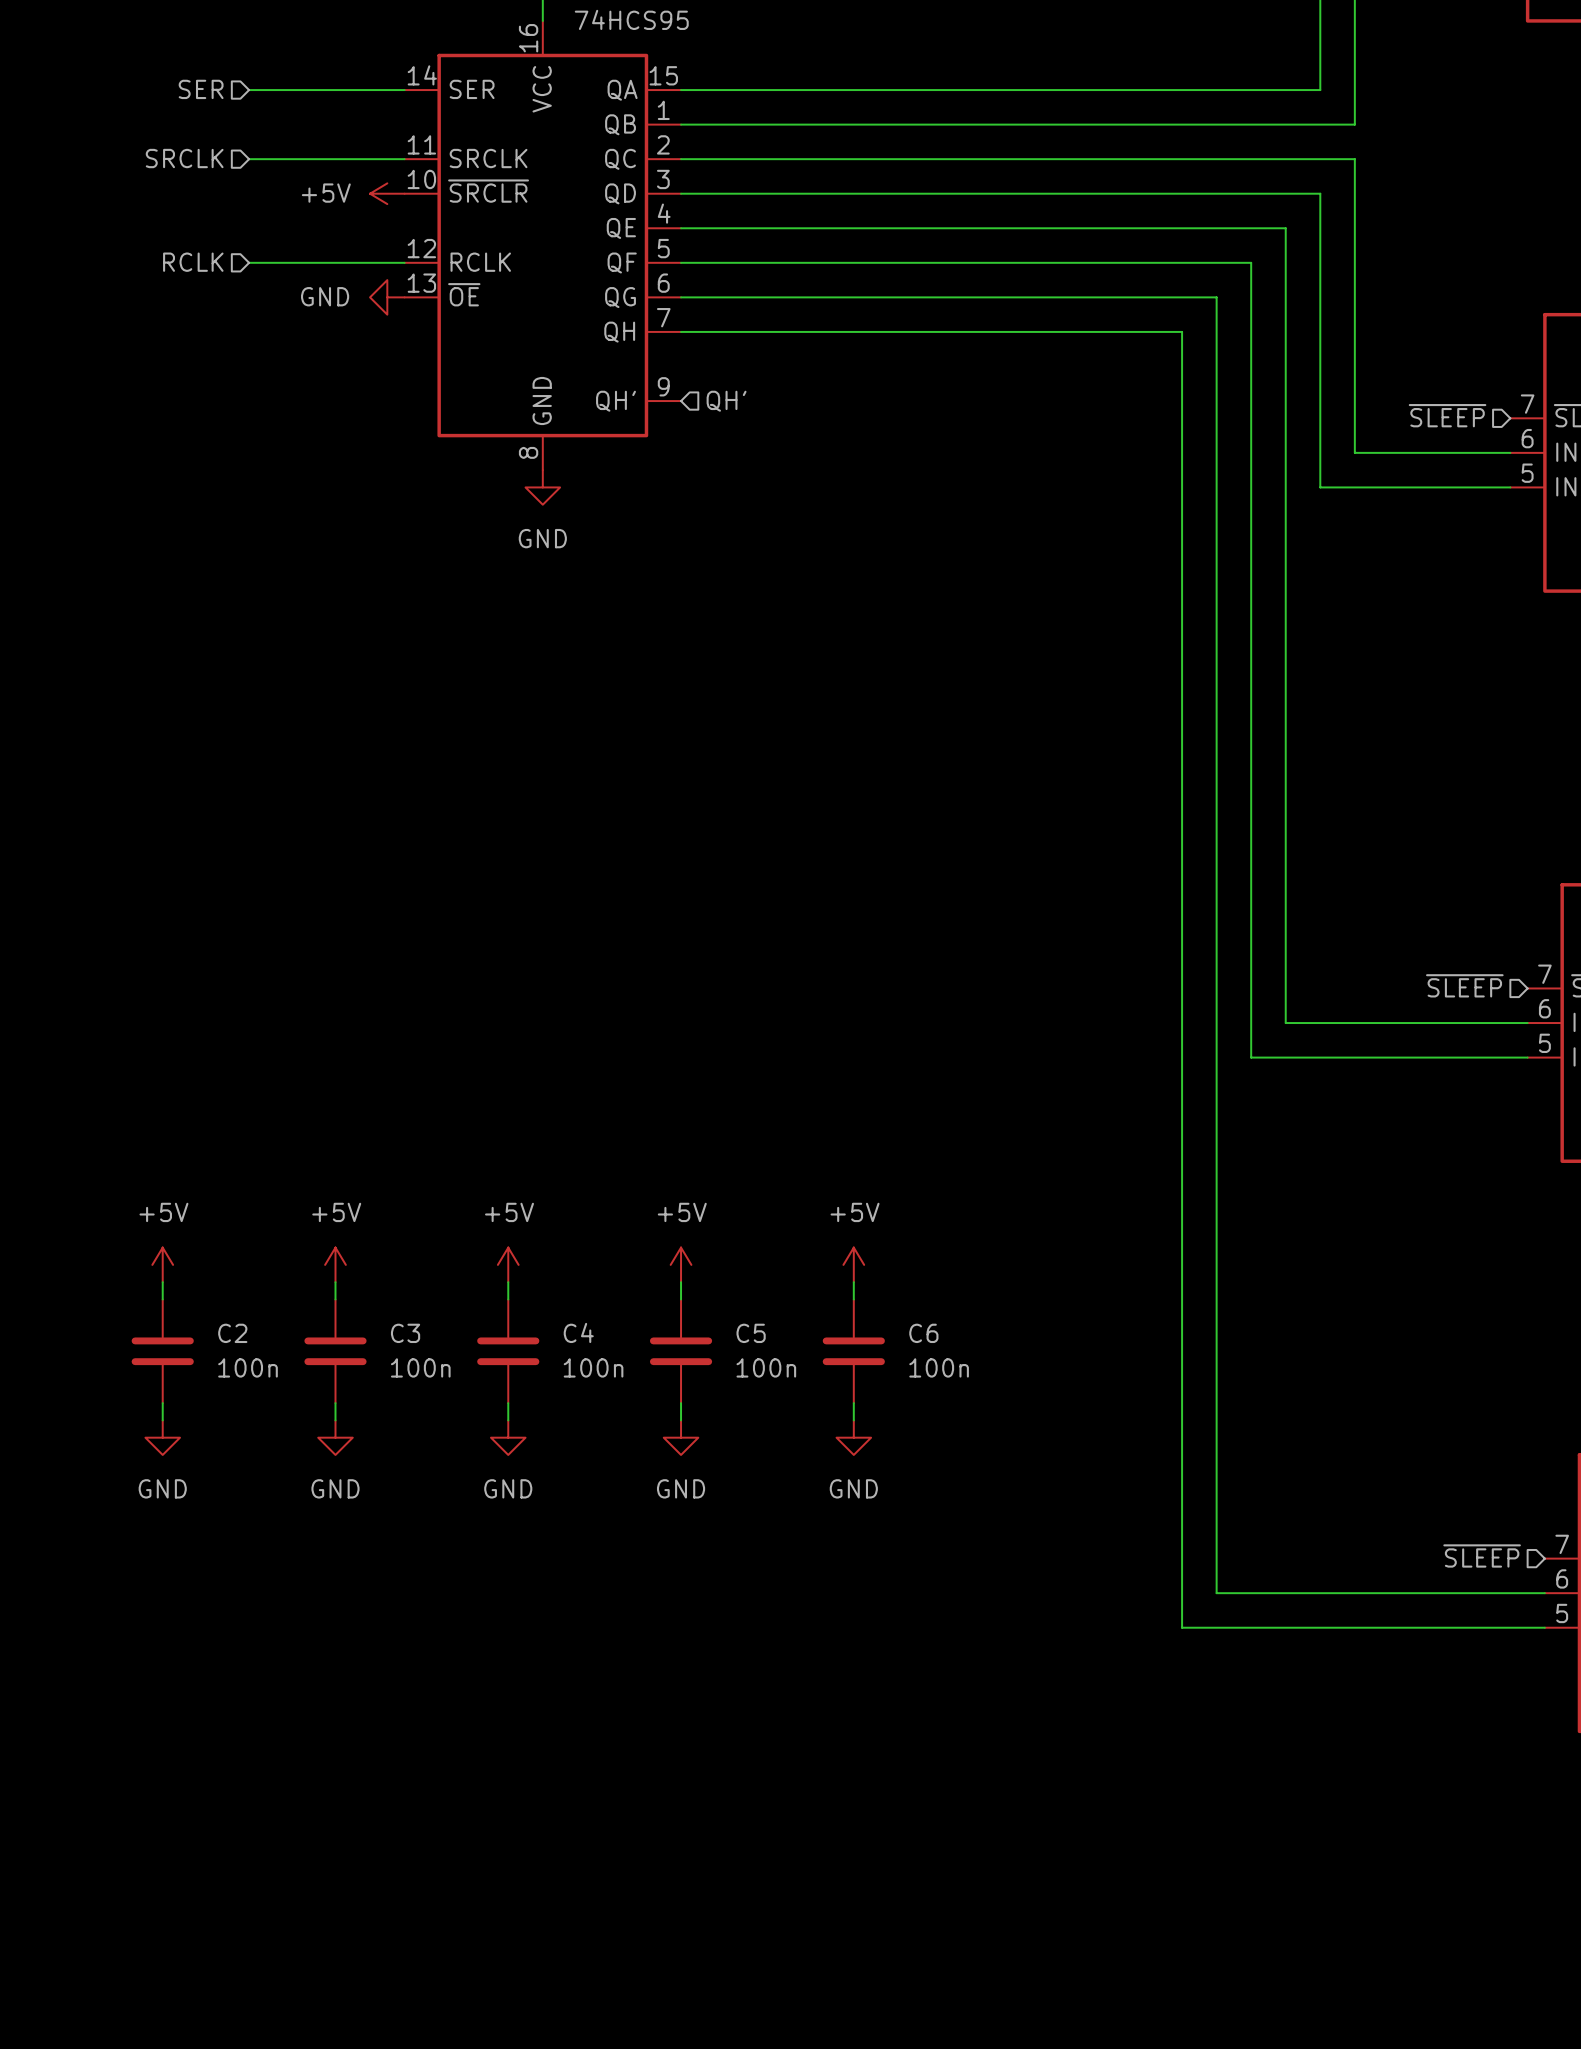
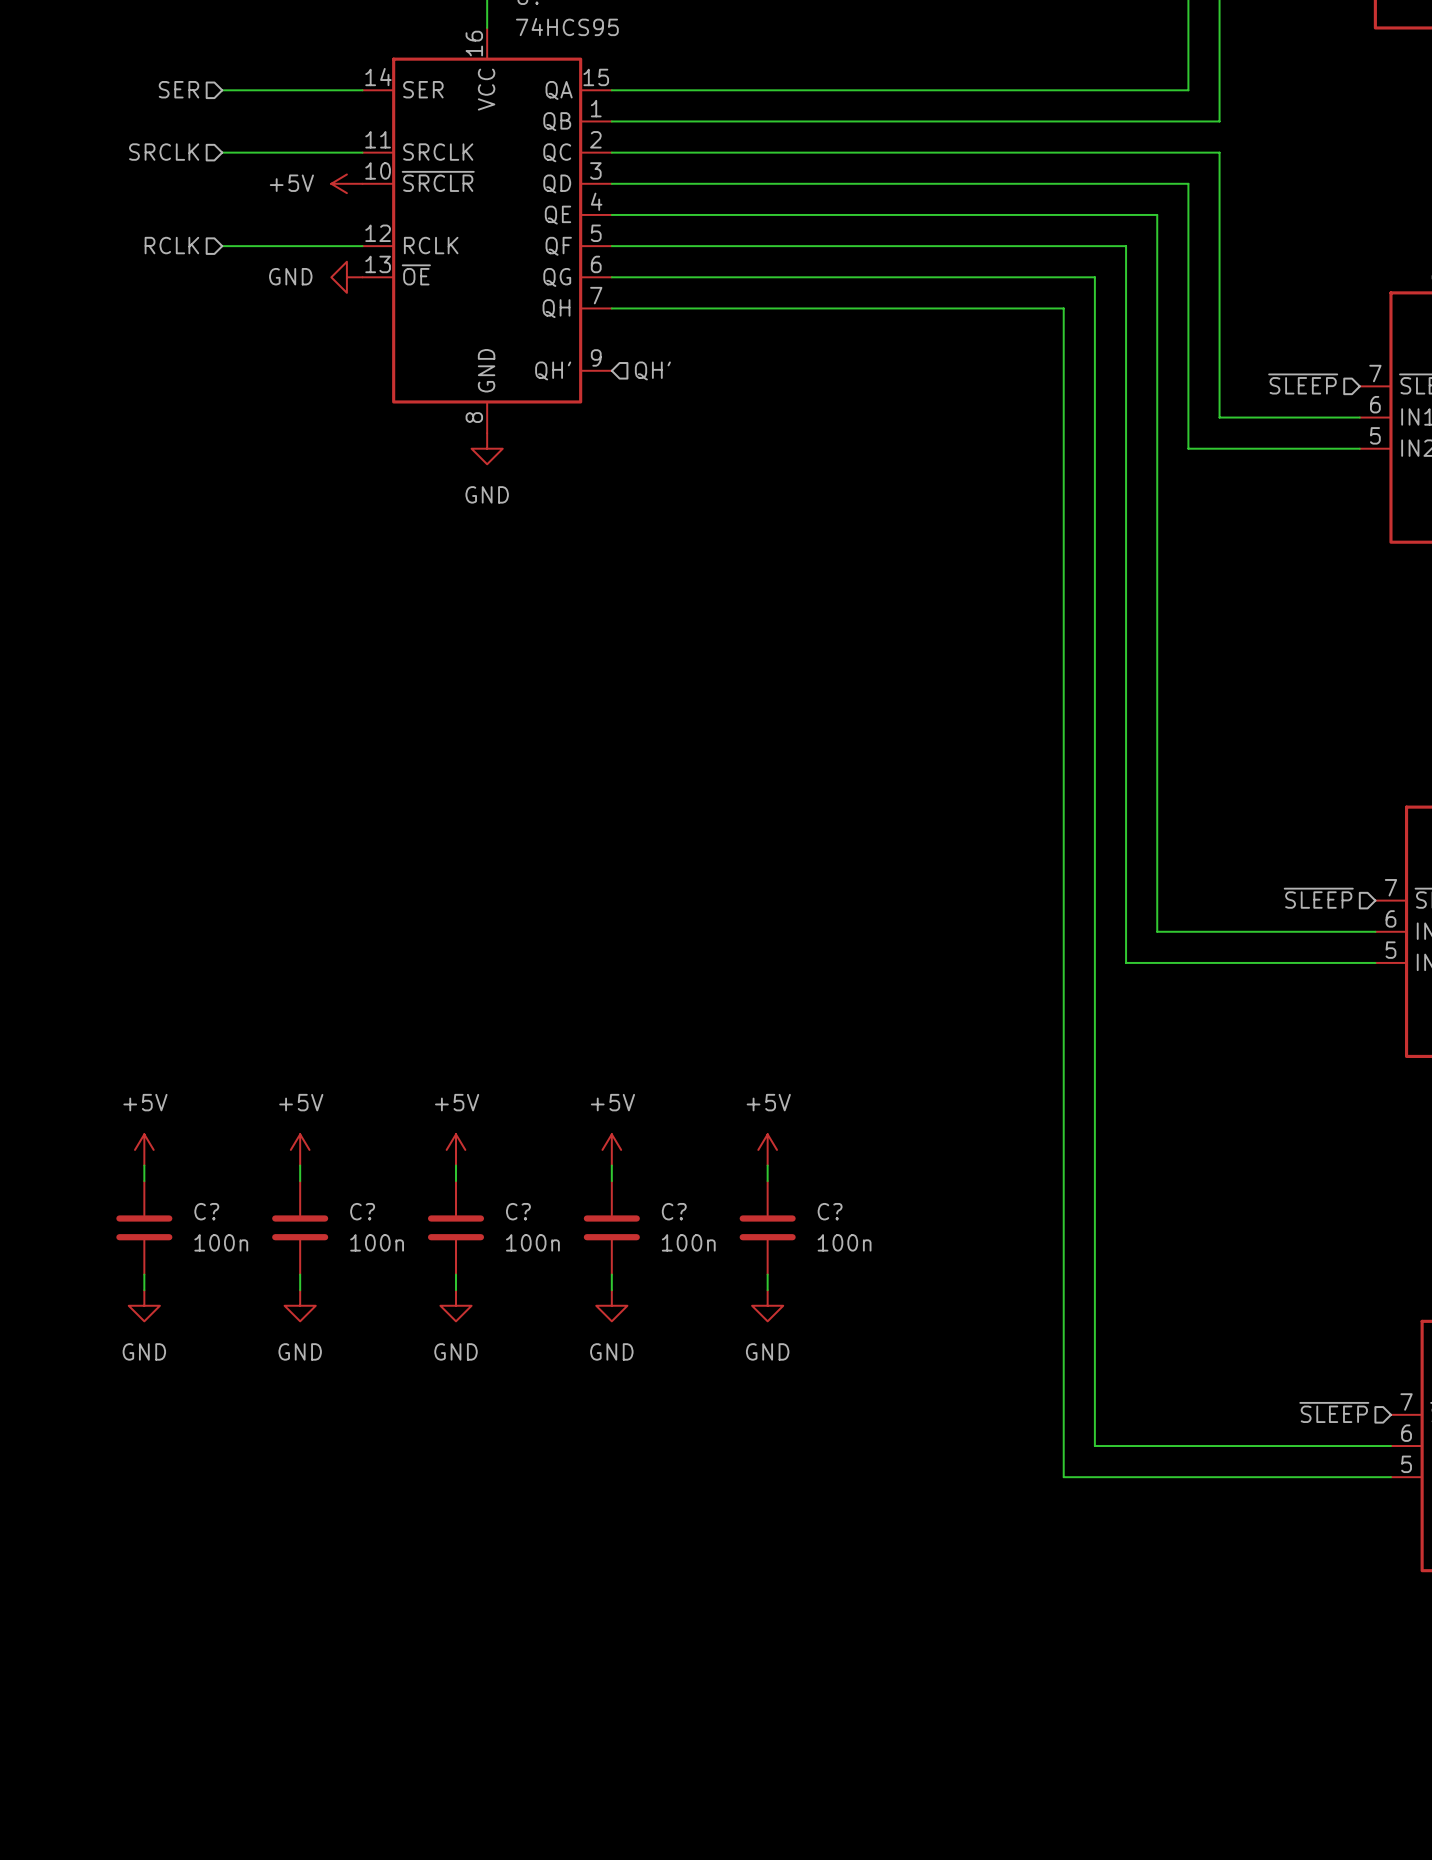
C4 name: C4 (578, 1332) -> C? (518, 1211)
C2 name: C2 (232, 1333) -> C? (206, 1211)
C3 name: C3 (405, 1333) -> C? (362, 1211)
C5 name: C5 (751, 1333) -> C? (674, 1211)
C6 name: C6 (923, 1333) -> C? (830, 1211)

